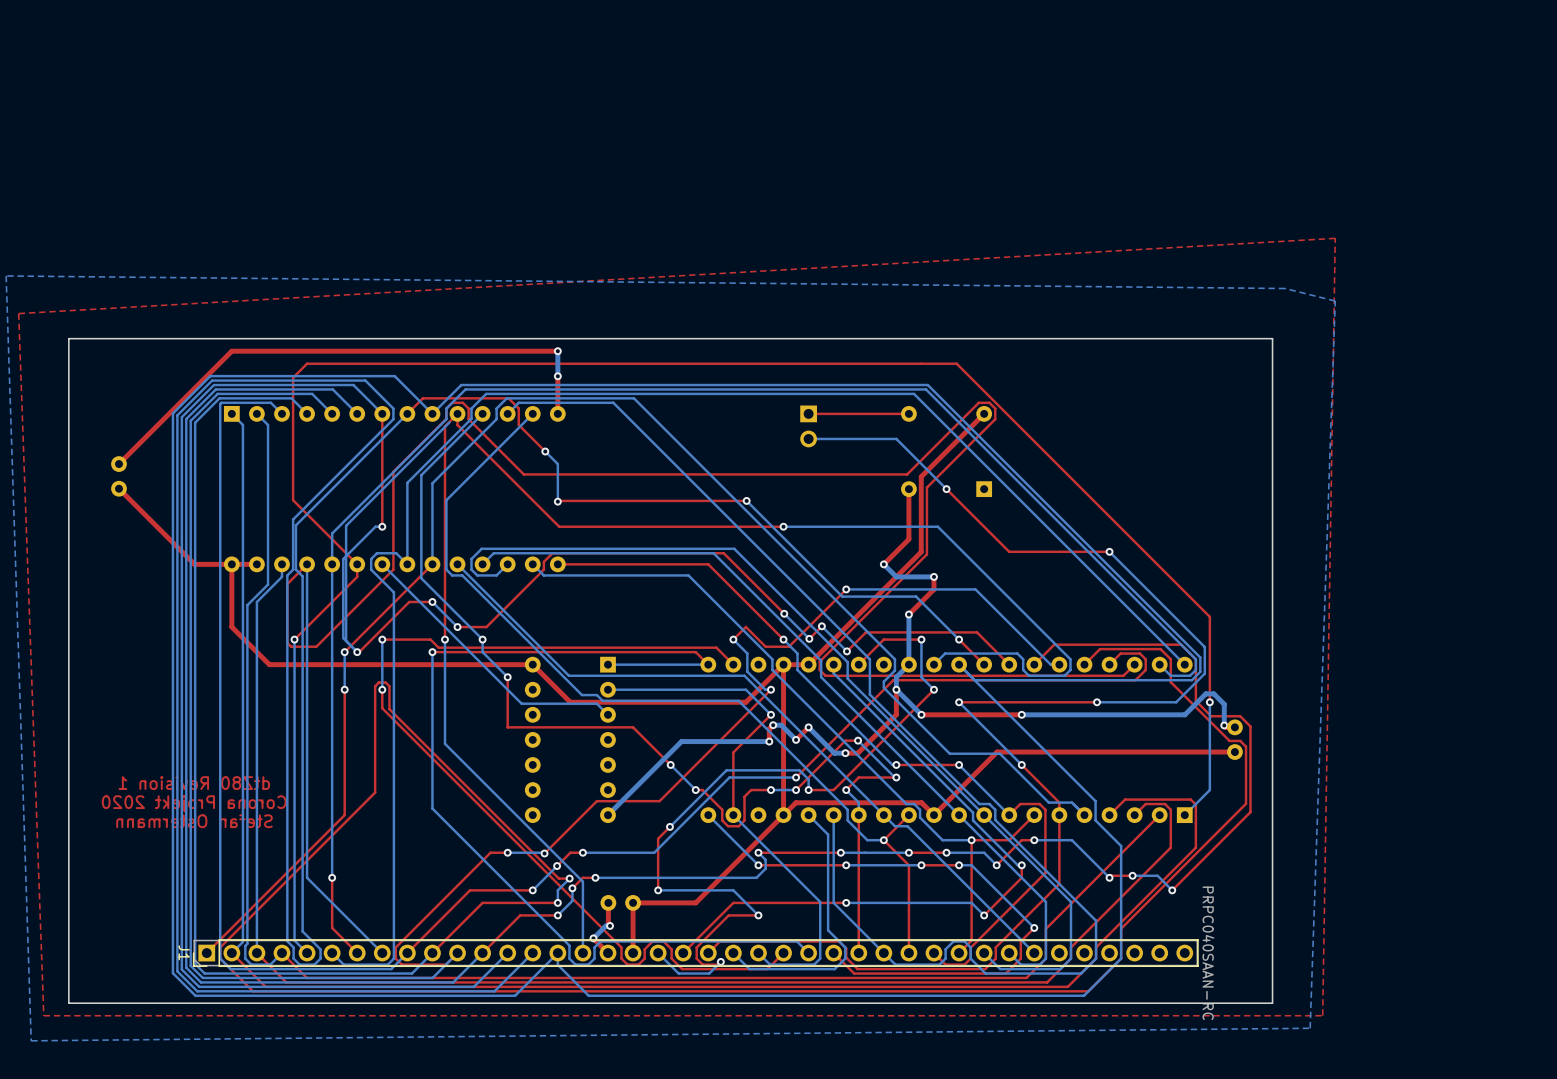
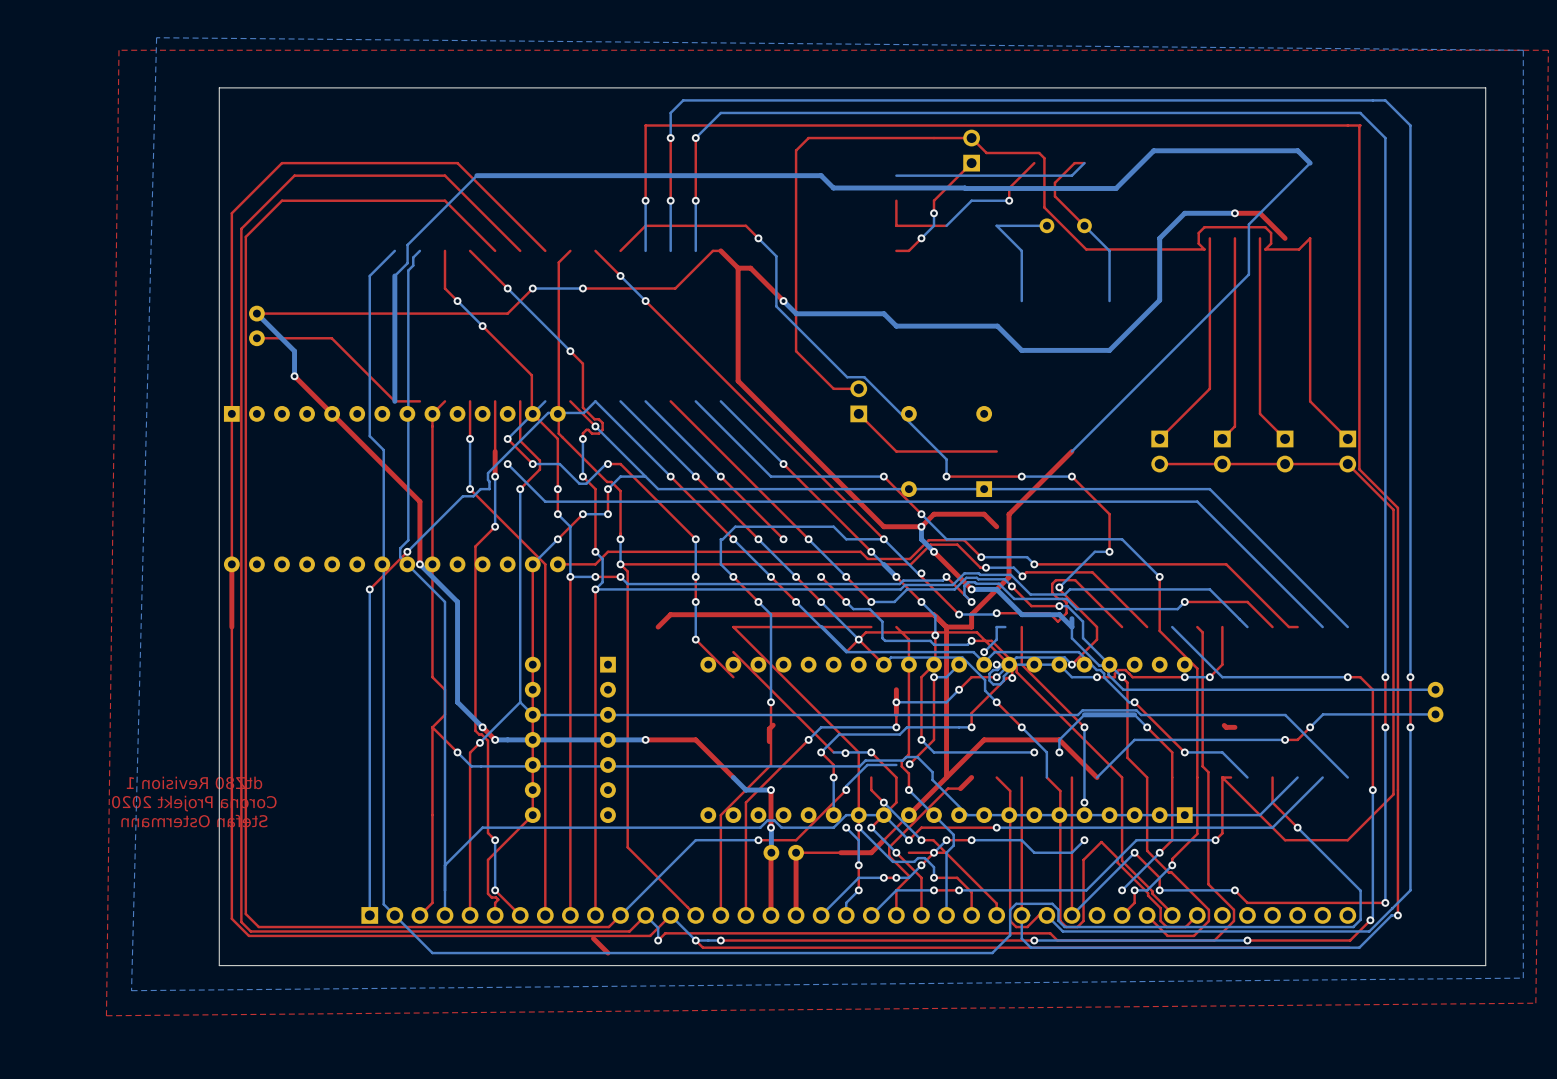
bottom track: none -> (670, 138) (670, 112) (683, 100) (1385, 100) (1410, 125) (1410, 677)
top track: none -> (670, 138) (670, 200)
via: none -> (670, 138)
bottom track: none -> (695, 138) (720, 112) (1360, 112) (1385, 138) (1385, 677)
top track: none -> (695, 138) (695, 200)
via: none -> (695, 138)
part: none -> (971, 150)
top track: none -> (971, 163) (934, 200) (934, 213)
top track: none -> (1034, 163) (1009, 188) (1009, 200)
bottom track: none -> (1084, 163) (1071, 175) (896, 175)
top track: none -> (1084, 163) (1074, 163) (1054, 182) (1054, 196) (1084, 225)
bottom track: none -> (645, 200) (645, 250)
top track: none -> (645, 200) (645, 125) (1360, 125) (1359, 469) (1397, 507) (1397, 915)
via: none -> (645, 200)
bottom track: none -> (670, 200) (670, 250)
via: none -> (670, 200)
bottom track: none -> (695, 200) (695, 250)
via: none -> (695, 200)
top track: none -> (896, 200) (896, 225) (946, 225)
bottom track: none -> (1009, 200) (971, 200) (946, 225)
via: none -> (1009, 200)
bottom track: none -> (934, 213) (934, 225) (921, 238)
via: none -> (934, 213)
bottom track: none -> (1234, 213) (1184, 213) (1159, 238) (1159, 300) (1109, 350) (1021, 350) (997, 326) (896, 326) (884, 313) (796, 313) (783, 301)
top track: none -> (1234, 213) (1260, 213) (1285, 238)
via: none -> (1234, 213)
bottom track: none -> (1046, 225) (996, 225) (1021, 250) (1021, 301)
part: none -> (1065, 225)
bottom track: none -> (1084, 225) (1109, 250) (1109, 301)
bottom track: none -> (758, 238) (776, 256) (776, 306) (847, 377) (864, 377) (946, 459) (946, 476)
top track: none -> (758, 238) (745, 225) (645, 225) (620, 250)
via: none -> (758, 238)
top track: none -> (921, 238) (908, 250) (896, 250)
via: none -> (921, 238)
top track: none -> (1209, 238) (1209, 388) (1159, 438)
top track: none -> (1234, 238) (1234, 426) (1222, 438)
top track: none -> (1260, 238) (1260, 413) (1285, 438)
top zone outline: (1335, 238) (1322, 1015) (43, 1015) (18, 313) (1335, 238) -> (1548, 50) (1535, 1003) (106, 1015) (118, 50) (1548, 50)
bottom track: none -> (394, 250) (369, 275) (369, 436) (383, 450) (383, 904) (432, 953) (992, 953) (1010, 935) (1010, 909) (1016, 903) (1052, 903) (1058, 909) (1058, 920) (1064, 927) (1353, 927) (1360, 919) (1360, 890) (1297, 827)
top track: none -> (445, 250) (445, 288) (457, 301)
top track: none -> (470, 250) (507, 288)
top track: none -> (495, 250) (445, 200) (282, 200) (245, 236) (245, 914) (258, 927) (608, 927) (620, 915)
top track: none -> (520, 250) (445, 175) (294, 175) (241, 228) (241, 922) (250, 931) (629, 931) (645, 915)
top track: none -> (545, 250) (457, 163) (282, 163) (231, 213) (231, 564)
top track: none -> (570, 250) (558, 262) (558, 433) (607, 481) (611, 481) (620, 491) (620, 539)
top track: none -> (595, 250) (620, 275)
top track: none -> (738, 268) (720, 250) (712, 250) (675, 288) (582, 288)
top track: none -> (738, 268) (738, 381) (883, 526) (921, 526) (934, 514) (984, 514) (996, 526)
top track: none -> (738, 268) (750, 268) (783, 301)
bottom zone outline: (6, 275) (1285, 288) (1335, 301) (1310, 1028) (31, 1040) (6, 275) -> (156, 37) (1523, 50) (1523, 978) (131, 990) (156, 37)
bottom track: none -> (620, 275) (645, 301)
via: none -> (620, 275)
bottom track: none -> (507, 288) (570, 351)
via: none -> (507, 288)
top track: none -> (532, 288) (507, 313) (256, 313)
via: none -> (532, 288)
bottom track: none -> (582, 288) (532, 288)
via: none -> (582, 288)
bottom track: none -> (457, 301) (482, 326)
via: none -> (457, 301)
top track: none -> (645, 301) (883, 539)
via: none -> (645, 301)
via: none -> (783, 301)
bottom track: none -> (256, 313) (294, 351) (294, 376)
top track: none -> (482, 326) (531, 375) (531, 412) (557, 438) (557, 514)
via: none -> (482, 326)
top track: none -> (256, 338) (331, 338) (394, 401) (419, 401)
board edge: (1272, 338) (1272, 1003) (68, 1003) (68, 338) (1272, 338) -> (1485, 87) (1485, 965) (219, 965) (219, 87) (1485, 87)
bottom track: (557, 351) (557, 376) -> (620, 539) (620, 564)
top track: (557, 351) (231, 351) (118, 464) -> none
via position: (557, 351) -> (570, 351)
top track: none -> (570, 351) (582, 363) (582, 407) (594, 419) (598, 419) (602, 422) (602, 429) (598, 433) (592, 433) (586, 429) (582, 433) (582, 438)
top track: none -> (294, 376) (419, 501) (419, 564)
via: none -> (294, 376)
top track: (557, 376) (557, 413) -> (470, 401) (470, 438)
via: (557, 376) -> none
top track: none -> (858, 388) (833, 388) (796, 351) (796, 150) (808, 138) (971, 138) (986, 153) (1039, 153) (1044, 158) (1044, 207) (1086, 249) (1204, 249) (1198, 243) (1198, 233) (1204, 227) (1265, 227) (1271, 233) (1271, 243) (1265, 249) (1299, 249) (1310, 238) (1310, 401) (1347, 438)
bottom track: none -> (394, 401) (394, 275) (407, 263) (407, 244) (476, 175) (821, 175) (833, 188) (1116, 188) (1153, 150) (1297, 150) (1310, 163) (1248, 224) (1248, 274) (1071, 451)
top track: none -> (445, 401) (432, 413) (432, 677) (445, 689) (445, 714) (432, 727)
top track: none -> (495, 401) (495, 476)
top track: none -> (520, 401) (520, 440) (539, 460) (539, 469) (520, 489)
bottom track: none -> (545, 401) (532, 413)
top track: none -> (570, 401) (595, 426)
bottom track: none -> (620, 401) (695, 476)
bottom track: none -> (645, 401) (720, 476)
top track: none -> (670, 401) (808, 539)
bottom track: none -> (695, 401) (771, 476) (883, 476)
bottom track: none -> (720, 401) (783, 464)
bottom track: (231, 413) (242, 425) (242, 941) (231, 953) -> none
bottom track: (256, 413) (268, 425) (268, 584) (247, 605) (247, 943) (245, 945) (245, 958) (251, 964) (270, 964) (282, 953) -> none
bottom track: (282, 413) (270, 402) (220, 403) (220, 958) (230, 969) (391, 969) (407, 953) -> none
bottom track: (307, 413) (291, 398) (219, 398) (195, 422) (195, 964) (204, 973) (411, 973) (432, 953) -> none
bottom track: (332, 413) (312, 393) (217, 393) (190, 420) (190, 965) (202, 977) (432, 977) (457, 953) -> none
bottom track: (357, 413) (332, 389) (215, 389) (186, 419) (186, 967) (201, 982) (453, 982) (482, 953) -> none
bottom track: (382, 413) (353, 385) (214, 385) (181, 417) (181, 969) (199, 986) (473, 986) (507, 953) -> none
top track: (382, 413) (382, 526) -> none
bottom track: (407, 413) (295, 525) (295, 569) (302, 576) (302, 931) (320, 949) (320, 958) (314, 964) (299, 964) (293, 958) (293, 947) (287, 941) (287, 575) (293, 569) (293, 519) (393, 419) (393, 408) (365, 380) (212, 380) (177, 415) (177, 971) (197, 991) (494, 991) (532, 953) -> none
top track: (407, 413) (422, 398) (508, 398) (518, 408) (518, 425) (545, 451) -> none
bottom track: (482, 413) (421, 475) (421, 578) -> (407, 564) (421, 578)
bottom track: (507, 413) (518, 402) (613, 402) (869, 659) (869, 694) (979, 804) (989, 804) (995, 809) (995, 819) (1096, 920) (1096, 958) (1081, 973) (985, 973) (970, 958) (970, 947) (964, 941) (953, 941) (945, 949) (945, 958) (939, 964) (895, 964) (833, 902) (833, 815) -> (833, 777) (833, 815)
top track: none -> (858, 413) (896, 451) (996, 451)
top track: (908, 413) (808, 413) -> none
top track: (984, 413) (921, 476) (921, 552) (808, 664) (783, 664) -> none
bottom track: (449, 422) (346, 525) (346, 641) -> none
bottom track: none -> (595, 426) (658, 489) (1209, 489) (1347, 627)
via: none -> (595, 426)
part rotation: 0° (808, 426) -> 180° (858, 401)
part position: (808, 426) -> (858, 401)
bottom track: none -> (470, 438) (470, 489)
via: none -> (470, 438)
bottom track: (507, 438) (446, 500) (446, 569) (452, 575) (462, 575) (581, 695) (596, 695) (602, 700) (738, 700) (847, 809) (847, 820) (867, 840) (883, 840) -> none
top track: none -> (507, 438) (532, 464)
via: none -> (507, 438)
bottom track: none -> (582, 438) (582, 476)
via: none -> (582, 438)
bottom track: (808, 438) (896, 438) (946, 489) -> none
bottom track: (545, 451) (557, 464) (557, 501) -> none
via position: (545, 451) -> (532, 464)
top track: none -> (1071, 451) (1009, 514) (1009, 577) (971, 614) (971, 627) (946, 627) (933, 614) (670, 614) (658, 627)
part: none -> (1159, 451)
part: none -> (1222, 451)
part: none -> (1285, 451)
part: none -> (1347, 451)
bottom track: none -> (507, 464) (545, 501) (1197, 501) (1322, 627)
via: none -> (507, 464)
bottom track: none -> (608, 464) (586, 483) (579, 483) (559, 464) (532, 464)
top track: none -> (608, 464) (620, 464) (695, 539)
via: none -> (608, 464)
top track: none -> (783, 464) (871, 551)
via: none -> (783, 464)
top track: none -> (1159, 464) (1347, 464) (1393, 509) (1393, 794) (1347, 840) (1285, 840) (1222, 777)
part position: (118, 476) -> (256, 325)
via: none -> (495, 476)
top track: none -> (582, 476) (595, 489) (595, 551)
via: none -> (582, 476)
bottom track: none -> (645, 476) (620, 476) (608, 489)
bottom track: none -> (670, 476) (595, 401) (583, 412) (548, 412) (487, 473) (489, 489) (480, 489) (473, 496) (462, 496) (407, 551)
top track: none -> (670, 476) (733, 539)
via: none -> (670, 476)
top track: none -> (695, 476) (758, 539)
via: none -> (695, 476)
top track: none -> (720, 476) (783, 539)
via: none -> (720, 476)
top track: none -> (883, 476) (921, 514)
via: none -> (883, 476)
top track: none -> (1021, 476) (946, 476)
via: none -> (1021, 476)
bottom track: none -> (1071, 476) (1021, 476)
via: none -> (1071, 476)
top track: (118, 488) (194, 564) (256, 564) -> none
top track: none -> (470, 489) (545, 564) (545, 915)
via: none -> (470, 489)
bottom track: none -> (520, 489) (520, 702) (479, 742)
via: none -> (520, 489)
via: none -> (557, 489)
top track: none -> (608, 489) (608, 514)
via: none -> (608, 489)
top track: (908, 489) (908, 539) (883, 564) -> none
top track: (946, 489) (1009, 551) (1109, 551) -> (1071, 476) (1109, 514) (1109, 551)
via position: (946, 489) -> (946, 476)
bottom track: (746, 500) (842, 596) (916, 596) (921, 601) -> none
top track: (746, 500) (557, 501) -> none
via: (746, 500) -> none
via: (557, 501) -> none
bottom track: none -> (557, 514) (570, 526) (570, 576) (595, 576)
via: none -> (557, 514)
top track: none -> (582, 514) (557, 539)
via: none -> (582, 514)
bottom track: none -> (608, 514) (582, 514)
via: none -> (608, 514)
bottom track: none -> (921, 514) (946, 539) (1122, 539) (1159, 576)
via: none -> (921, 514)
bottom track: (382, 526) (375, 526) (343, 559) (343, 638) (357, 652) -> none
via: (382, 526) -> none
top track: none -> (495, 526) (475, 546) (475, 730) (487, 740) (487, 833) (495, 840)
via: none -> (495, 526)
bottom track: none -> (783, 526) (735, 526) (720, 539) (720, 564) (733, 576)
top track: (783, 526) (559, 526) (457, 425) (457, 413) (445, 426) (445, 639) -> none
via position: (783, 526) -> (783, 539)
bottom track: (833, 526) (937, 526) (1070, 659) (1070, 669) (1064, 675) (1028, 675) (1023, 669) (1023, 659) (1017, 653) (945, 653) (934, 664) -> (833, 526) (846, 539) (883, 539) (917, 573) (921, 573)
bottom track: none -> (921, 526) (921, 539) (934, 551)
via: none -> (921, 526)
via: none -> (557, 539)
via: none -> (620, 539)
bottom track: none -> (695, 539) (695, 576)
via: none -> (695, 539)
bottom track: none -> (733, 539) (771, 576)
via: none -> (733, 539)
bottom track: none -> (758, 539) (796, 576)
via: none -> (758, 539)
bottom track: none -> (808, 539) (846, 576)
via: none -> (808, 539)
via: none -> (883, 539)
top track: none -> (407, 551) (369, 589)
via: none -> (407, 551)
bottom track: none -> (595, 551) (602, 558) (602, 582) (595, 589) (846, 589)
via: none -> (595, 551)
bottom track: none -> (871, 551) (883, 564)
via: none -> (871, 551)
top track: none -> (934, 551) (971, 589)
via: none -> (934, 551)
bottom track: (1109, 551) (1204, 647) (1204, 673) (1176, 702) (1134, 702) -> (1109, 551) (1094, 551) (1059, 587)
bottom track: (400, 557) (396, 553) (376, 553) (371, 559) (371, 569) (393, 592) (393, 958) (387, 964) (343, 964) (332, 953) -> (400, 557) (400, 548) (408, 540) (408, 270) (413, 265) (413, 257) (419, 250)
bottom track: none -> (981, 557) (1027, 557) (1034, 564)
via: none -> (981, 557)
bottom track: (282, 564) (282, 576) (256, 601) (256, 953) -> none
bottom track: (307, 564) (307, 877) (382, 953) -> none
top track: (307, 564) (287, 584) (287, 643) (291, 646) (316, 646) (393, 569) (393, 471) (446, 418) (446, 408) (452, 402) (462, 402) (468, 408) (468, 419) (523, 474) (907, 474) (978, 402) (989, 402) (995, 408) (995, 419) (926, 487) (926, 554) (819, 661) (819, 669) (825, 675) (1123, 675) (1134, 664) -> none
bottom track: (382, 564) (520, 702) -> none
bottom track: (407, 564) (407, 482) (471, 418) (471, 408) (486, 393) (914, 393) (1184, 664) -> none
bottom track: none -> (419, 564) (457, 601) (457, 702) (482, 727)
via: none -> (419, 564)
bottom track: (432, 564) (432, 483) (496, 419) (496, 408) (506, 398) (633, 398) (894, 659) (894, 670) (883, 681) (883, 687) (949, 753) (999, 753) (1048, 802) (1071, 802) (1084, 815) -> none
top track: (432, 564) (344, 652) -> none
bottom track: (457, 564) (568, 675) (744, 675) (883, 815) -> (445, 865) (482, 827) (760, 827) (767, 820) (774, 820) (781, 827) (833, 827) (846, 815) (883, 815)
bottom track: (482, 564) (493, 553) (713, 553) (821, 660) (821, 677) (1045, 901) (1045, 958) (1039, 964) (1020, 964) (1009, 953) -> none
bottom track: (507, 564) (496, 575) (477, 575) (471, 569) (471, 559) (481, 548) (734, 548) (847, 662) (847, 678) (1070, 901) (1070, 958) (1060, 969) (1000, 969) (984, 953) -> none
bottom track: (532, 564) (543, 575) (688, 575) (772, 659) (772, 669) (906, 804) (914, 804) (920, 809) (920, 817) (942, 840) (971, 840) -> (532, 564) (557, 539)
top track: none -> (532, 564) (532, 815) (487, 859) (487, 893) (498, 899) (495, 902) (495, 915)
top track: (620, 564) (595, 564) -> (981, 557) (964, 540) (928, 540) (909, 558) (867, 558) (860, 551) (608, 551) (595, 564)
top track: none -> (620, 564) (627, 571) (627, 847) (695, 915)
via: none -> (620, 564)
top track: (708, 564) (783, 639) -> (708, 564) (910, 564) (930, 544) (957, 544) (980, 567) (986, 567)
via: (883, 564) -> none
top track: none -> (1034, 564) (1226, 564) (1288, 627) (1297, 627)
via: none -> (1034, 564)
bottom track: none -> (986, 567) (1013, 567) (1022, 576)
via: none -> (986, 567)
top track: none -> (921, 573) (921, 576) (959, 614)
via: none -> (921, 573)
top track: none -> (570, 576) (570, 915)
via: none -> (570, 576)
via: none -> (595, 576)
top track: none -> (620, 576) (595, 576)
via: none -> (620, 576)
top track: none -> (695, 576) (695, 601)
via: none -> (695, 576)
top track: none -> (733, 576) (758, 601)
via: none -> (733, 576)
top track: none -> (771, 576) (796, 601)
via: none -> (771, 576)
top track: none -> (796, 576) (821, 601)
via: none -> (796, 576)
top track: none -> (821, 576) (846, 601)
via: none -> (821, 576)
top track: none -> (846, 576) (871, 601)
via: none -> (846, 576)
top track: none -> (896, 576) (921, 601)
via: none -> (896, 576)
bottom track: (934, 576) (896, 576) -> (871, 752) (833, 752)
top track: (934, 576) (934, 589) (908, 614) -> none
via: (934, 576) -> none
bottom track: none -> (946, 576) (942, 580) (903, 580) (899, 584) (627, 584) (620, 576)
via: none -> (946, 576)
top track: none -> (1022, 576) (1026, 572) (1092, 572) (1147, 627)
via: none -> (1022, 576)
top track: none -> (1159, 576) (1159, 630) (1197, 668) (1197, 833) (1172, 859) (1172, 865)
via: none -> (1159, 576)
top track: none -> (1011, 586) (1031, 606) (1059, 606)
via: none -> (1011, 586)
top track: none -> (1059, 587) (1097, 627) (1097, 639) (1071, 664)
via: none -> (1059, 587)
bottom track: none -> (369, 589) (369, 915)
via: none -> (369, 589)
top track: none -> (595, 589) (595, 915)
via: none -> (595, 589)
top track: (846, 589) (788, 646) (765, 646) (745, 627) (733, 639) -> none
via: (846, 589) -> none
bottom track: none -> (900, 589) (905, 584) (952, 584) (964, 573) (1010, 574) (1030, 594) (1064, 594) (1069, 589) (1209, 589) (1247, 627)
bottom track: (907, 589) (900, 589) -> (907, 589) (894, 601) (871, 601)
bottom track: (971, 589) (954, 589) -> (1011, 586) (1004, 579) (966, 577) (954, 589)
via: none -> (971, 589)
bottom track: (975, 589) (1050, 664) -> (975, 589) (996, 589) (1021, 614) (1059, 614) (1071, 627)
bottom track: (432, 601) (457, 627) -> none
top track: (432, 601) (409, 601) (357, 652) -> none
via: (432, 601) -> none
bottom track: (445, 601) (482, 639) (482, 652) (507, 677) -> (445, 601) (445, 639)
bottom track: none -> (695, 601) (695, 639)
via: none -> (695, 601)
bottom track: none -> (758, 601) (771, 614) (771, 702)
via: none -> (758, 601)
via: none -> (796, 601)
bottom track: none -> (821, 601) (858, 639)
via: none -> (821, 601)
bottom track: none -> (846, 601) (853, 609) (869, 609) (882, 621) (882, 638) (885, 640) (930, 640) (934, 644) (967, 644) (971, 640)
via: none -> (846, 601)
via: none -> (871, 601)
via: none -> (921, 601)
via: none -> (971, 601)
bottom track: none -> (1184, 601) (1177, 609) (1076, 609) (1066, 598) (1014, 598) (999, 583) (968, 582) (964, 586) (964, 594) (971, 601)
top track: none -> (1184, 601) (1247, 601) (1272, 627)
via: none -> (1184, 601)
bottom track: none -> (1059, 606) (1067, 606) (1083, 621) (1083, 638) (1122, 677)
via: none -> (1059, 606)
bottom track: (784, 613) (809, 638) -> none
top track: (784, 613) (723, 553) (552, 553) (543, 561) (543, 569) (486, 627) (457, 627) -> none
via: (784, 613) -> none
bottom track: none -> (996, 613) (959, 614)
top track: none -> (996, 613) (1049, 613) (1057, 621) (1066, 613) (1066, 602) (1062, 598) (1058, 598) (1052, 592) (1052, 583) (1055, 580) (1075, 580) (1122, 627)
via: none -> (996, 613)
bottom track: (908, 614) (908, 664) (896, 677) (896, 689) (921, 714) -> none
via: (908, 614) -> none
via: none -> (959, 614)
bottom track: (935, 615) (959, 639) -> (935, 615) (935, 635)
top track: none -> (935, 615) (946, 627) (946, 777)
bottom track: none -> (1071, 618) (1071, 627)
top track: (821, 626) (809, 638) -> none
via: (821, 626) -> none
top track: (231, 627) (269, 664) (532, 664) (570, 702) (745, 702) (783, 664) -> (231, 627) (231, 918) (248, 935) (650, 935) (670, 915)
via: (457, 627) -> none
top track: none -> (871, 627) (733, 627) (858, 752) (858, 815)
top track: none -> (896, 627) (908, 639) (908, 754) (901, 761) (901, 766) (908, 773) (908, 790)
bottom track: none -> (1005, 627) (996, 627) (996, 639) (984, 652)
top track: none -> (1021, 627) (1021, 664) (1084, 727)
bottom track: none -> (1071, 627) (1071, 638) (1099, 665) (1102, 665) (1108, 671) (1108, 674) (1123, 689) (1435, 689)
bottom track: none -> (1172, 627) (1222, 677) (1347, 677)
top track: none -> (1197, 627) (1202, 632) (1202, 766) (1208, 772) (1208, 884) (1233, 909) (1233, 921) (1214, 940) (1057, 940) (1050, 933) (665, 933) (658, 940)
top track: none -> (1222, 627) (1222, 664) (1209, 677)
top track: none -> (935, 635) (935, 663) (921, 677) (921, 739)
via: none -> (935, 635)
via: (809, 638) -> none
bottom track: (294, 639) (294, 940) (307, 953) -> none
top track: (294, 639) (357, 576) (357, 564) (293, 500) (293, 377) (307, 363) (956, 363) (1209, 616) (1209, 702) -> none
via: (294, 639) -> none
bottom track: (382, 639) (382, 689) -> (495, 476) (495, 526)
top track: (382, 639) (430, 639) (438, 647) (716, 647) (733, 664) -> none
via: (382, 639) -> none
via: (445, 639) -> none
via: (482, 639) -> none
top track: none -> (695, 639) (733, 677)
via: none -> (695, 639)
bottom track: (733, 639) (747, 653) (747, 671) (765, 689) (771, 689) -> none
via: (733, 639) -> none
bottom track: (783, 639) (797, 653) (797, 669) (892, 764) -> none
via: (783, 639) -> none
top track: none -> (858, 639) (883, 664)
bottom track: (921, 639) (921, 677) (934, 689) -> none
top track: (921, 639) (883, 639) (858, 664) -> none
via: (921, 639) -> none
top track: (959, 639) (984, 664) -> (946, 576) (971, 601)
via: (959, 639) -> none
top track: none -> (971, 640) (991, 640) (1016, 665) (1016, 672) (1122, 777) (1122, 860) (1152, 891) (1152, 893) (1172, 915)
via: none -> (971, 640)
via position: (846, 651) -> (858, 639)
bottom track: (344, 652) (344, 689) -> none
via: (344, 652) -> none
via: (357, 652) -> none
bottom track: (432, 652) (432, 808) (569, 945) (569, 958) (575, 964) (588, 964) (594, 958) (594, 947) (600, 941) (797, 941) (808, 953) -> none
top track: (432, 652) (695, 652) (708, 664) -> none
via: (432, 652) -> none
top track: none -> (733, 652) (833, 752)
via: none -> (984, 652)
bottom track: (708, 664) (608, 664) -> none
top track: (783, 664) (783, 815) -> none
bottom track: (833, 664) (833, 673) (917, 757) -> (457, 752) (471, 766) (859, 766) (865, 760) (902, 760) (906, 757) (917, 757)
bottom track: none -> (883, 664) (891, 657) (962, 657) (985, 680) (985, 690)
bottom track: (959, 664) (985, 690) -> (959, 664) (946, 677) (934, 677)
via: none -> (996, 664)
top track: none -> (1009, 664) (1012, 667) (1012, 678) (1006, 678) (971, 713) (971, 727)
top track: (1034, 664) (1054, 644) (1181, 644) (1195, 659) (1195, 700) (1211, 716) (1240, 716) (1250, 726) (1250, 812) (1172, 890) -> none
bottom track: none -> (1050, 664) (1015, 664) (1003, 676) (1003, 680) (1000, 684) (993, 684) (989, 680) (989, 673) (1002, 664) (996, 664)
bottom track: none -> (1059, 664) (1071, 677) (1097, 677)
bottom track: none -> (1071, 664) (1064, 657) (1016, 657) (996, 677)
via: none -> (1071, 664)
top track: (1084, 664) (1100, 649) (1160, 649) (1170, 659) (1170, 682) (1229, 740) (1240, 740) (1246, 746) (1246, 803) (1121, 928) (1121, 958) (1088, 991) (252, 991) (220, 958) (220, 947) (375, 792) (375, 686) (378, 682) (385, 682) (389, 686) (389, 709) (558, 878) (569, 878) -> none
top track: (1109, 664) (1120, 653) (1139, 653) (1145, 659) (1145, 669) (1135, 680) (893, 680) (796, 777) -> none
bottom track: (1159, 664) (1170, 675) (1190, 675) (1195, 669) (1195, 659) (926, 389) (465, 389) (446, 408) (446, 419) (332, 533) (332, 877) -> none
top track: (507, 677) (507, 727) (633, 727) (670, 764) -> none
via: (507, 677) -> none
top track: none -> (934, 677) (934, 739) (909, 764)
via: none -> (934, 677)
top track: none -> (996, 677) (971, 677) (959, 689)
via: none -> (996, 677)
via: none -> (1097, 677)
top track: none -> (1122, 677) (1127, 682) (1127, 757) (1147, 777) (1147, 850) (1208, 909) (1208, 921) (1193, 935) (1167, 935) (1147, 915)
via: none -> (1122, 677)
top track: none -> (1184, 677) (1132, 677) (1125, 670) (1118, 670) (1114, 673) (1114, 677) (1097, 677)
via: none -> (1184, 677)
bottom track: none -> (1209, 677) (1184, 677)
via: none -> (1209, 677)
top track: none -> (1347, 677) (1360, 677) (1372, 689) (1372, 790)
via: none -> (1347, 677)
top track: none -> (1385, 677) (1385, 727)
via: none -> (1385, 677)
top track: none -> (1410, 677) (1410, 727)
via: none -> (1410, 677)
via: none -> (1012, 678)
bottom track: (974, 680) (1191, 680) (1200, 671) (1200, 657) (927, 385) (461, 385) (432, 413) (394, 376) (210, 376) (172, 413) (172, 973) (195, 995) (515, 995) (557, 953) (557, 964) (588, 995) (1084, 995) (1121, 958) (1121, 846) (1095, 820) (1095, 801) (1046, 752) -> (1046, 777) (1046, 752)
top track: (344, 689) (344, 815) (206, 953) -> none
via: (344, 689) -> none
top track: (382, 689) (382, 708) (621, 947) (621, 958) (627, 964) (638, 964) (644, 958) (644, 949) (652, 941) (663, 941) (671, 949) (671, 958) (682, 969) (767, 969) (783, 953) -> none
via: (382, 689) -> none
bottom track: (608, 689) (745, 689) (771, 714) -> none
top track: (771, 689) (659, 801) (596, 801) (544, 853) -> none
via: (771, 689) -> none
via position: (896, 689) -> (896, 702)
top track: (934, 689) (833, 790) (808, 790) -> none
via: (934, 689) -> none
bottom track: none -> (959, 689) (946, 702) (896, 702)
via: none -> (959, 689)
top track: none -> (771, 702) (771, 764) (720, 815) (720, 915)
via: none -> (771, 702)
bottom track: (959, 702) (1021, 764) -> none
via: (959, 702) -> none
bottom track: (996, 702) (1021, 727) -> (871, 827) (896, 852)
top track: none -> (996, 702) (1021, 727)
via: none -> (996, 702)
top track: (1097, 702) (959, 702) -> none
via: (1097, 702) -> none
bottom track: (1129, 702) (1097, 702) -> (1129, 702) (1104, 677) (1104, 673) (1100, 670) (1096, 670) (1078, 652) (994, 652) (987, 659) (980, 659) (973, 652) (846, 652) (796, 601)
top track: none -> (1134, 702) (1184, 752)
via: none -> (1134, 702)
bottom track: (1209, 702) (1209, 790) (1184, 815) -> none
via: (1209, 702) -> none
bottom track: (521, 703) (596, 703) (608, 714) -> (521, 703) (532, 715) (1077, 715) (1082, 710) (1136, 710) (1141, 715) (1285, 715) (1347, 777)
top track: (771, 714) (733, 752) (733, 815) -> none
via: (771, 714) -> none
top track: (896, 714) (857, 753) (845, 753) -> (896, 714) (896, 727)
via: (921, 714) -> none
top track: (1021, 714) (921, 714) -> none
via position: (1021, 714) -> (1021, 727)
bottom track: (1084, 714) (1021, 714) -> (1084, 714) (1059, 739) (1059, 752)
bottom track: (1134, 714) (1184, 714) (1205, 693) (1213, 693) (1224, 704) (1224, 725) -> (1134, 714) (1147, 727)
bottom track: none -> (1435, 714) (1323, 714) (1310, 727)
bottom track: (773, 725) (781, 725) (796, 739) -> none
via: (773, 725) -> none
via: (1224, 725) -> none
top track: none -> (432, 727) (432, 902) (419, 915)
top track: none -> (432, 727) (457, 752)
top track: none -> (482, 727) (495, 739)
via: none -> (482, 727)
bottom track: (808, 727) (834, 753) (845, 753) -> none
top track: (808, 727) (796, 739) -> none
via: (808, 727) -> none
bottom track: none -> (896, 727) (821, 727) (808, 739)
via: none -> (896, 727)
bottom track: none -> (971, 727) (906, 727) (899, 734) (839, 734) (821, 752)
via: none -> (971, 727)
bottom track: none -> (1084, 727) (1084, 802)
via: none -> (1084, 727)
top track: none -> (1147, 727) (1172, 752) (1172, 840) (1159, 852)
via: none -> (1147, 727)
top track: none -> (1310, 727) (1297, 739) (1285, 739)
via: none -> (1310, 727)
bottom track: none -> (1385, 727) (1385, 902)
via: none -> (1385, 727)
bottom track: none -> (1410, 727) (1410, 890) (1369, 931) (1062, 931) (1046, 915)
via: none -> (1410, 727)
via: none -> (495, 739)
bottom track: none -> (645, 739) (495, 739)
top track: none -> (645, 739) (695, 739) (733, 777)
via: none -> (645, 739)
via: (796, 739) -> none
top track: none -> (808, 739) (745, 802) (745, 915)
via: none -> (808, 739)
bottom track: none -> (921, 739) (934, 752) (1034, 752)
via: none -> (921, 739)
part position: (1234, 739) -> (1435, 702)
bottom track: none -> (1285, 739) (1134, 739) (1097, 777)
via: none -> (1285, 739)
bottom track: (858, 740) (896, 777) -> none
top track: (858, 740) (845, 740) (796, 790) -> none
via: (858, 740) -> none
bottom track: (769, 741) (681, 741) (608, 815) -> none
via: (769, 741) -> none
top track: none -> (479, 742) (470, 752) (470, 915)
via: none -> (479, 742)
bottom track: (445, 743) (582, 881) (582, 953) -> (445, 743) (445, 915)
via: none -> (457, 752)
top track: none -> (821, 752) (833, 764) (833, 777)
via: none -> (821, 752)
top track: none -> (871, 752) (896, 777) (896, 802) (871, 827)
via: none -> (871, 752)
via: none -> (1059, 752)
bottom track: none -> (1184, 752) (1222, 752) (1247, 777)
via: none -> (1184, 752)
top track: (1234, 752) (997, 752) (971, 777) -> none
bottom track: (670, 764) (695, 790) -> none
via: (670, 764) -> none
via: (896, 764) -> none
via: none -> (909, 764)
bottom track: (959, 764) (1009, 815) -> none
top track: (959, 764) (896, 764) -> none
via: (959, 764) -> none
top track: (1021, 764) (1059, 802) (1059, 883) (995, 947) (995, 958) (985, 969) (857, 969) (846, 957) (846, 948) (839, 941) (719, 941) (708, 953) -> none
via position: (1021, 764) -> (1034, 752)
bottom track: (932, 772) (973, 812) (973, 820) (1017, 865) (1021, 865) -> (932, 772) (932, 779) (967, 815) (1260, 815) (1297, 777)
bottom track: (796, 777) (729, 777) (654, 852) (582, 852) -> none
via: (796, 777) -> none
via: none -> (833, 777)
top track: none -> (871, 777) (871, 790) (883, 802)
top track: (896, 777) (858, 777) (846, 790) -> (758, 840) (796, 840) (846, 790)
via: (896, 777) -> none
top track: none -> (996, 777) (1010, 790) (1010, 921) (1016, 927) (1027, 927) (1038, 915) (1046, 915)
top track: none -> (1021, 777) (1021, 865)
top track: none -> (1046, 777) (1060, 790) (1060, 921) (1066, 927) (1077, 927) (1083, 921) (1083, 859) (1101, 842) (1117, 858) (1117, 862) (1160, 908) (1160, 921) (1166, 927) (1185, 927) (1197, 915)
top track: none -> (1071, 777) (1071, 915)
top track: none -> (1097, 777) (1059, 739) (984, 739) (908, 815)
top track: none -> (1222, 777) (1222, 833) (1215, 840)
top track: none -> (1231, 777) (1222, 777)
top track: none -> (1272, 777) (1272, 802) (1297, 827)
bottom track: none -> (1322, 777) (1272, 827) (996, 827)
top track: (960, 788) (934, 815) (921, 802) (795, 802) (695, 902) (633, 902) (633, 953) -> (960, 788) (947, 788) (889, 847) (889, 856) (908, 875)
via: (695, 790) -> none
top track: (771, 790) (751, 790) (744, 796) (744, 820) (738, 826) (728, 826) (722, 820) (722, 809) (702, 790) (695, 790) -> (771, 790) (771, 827)
bottom track: (796, 790) (771, 790) -> (733, 777) (745, 790) (771, 790)
via: (796, 790) -> none
bottom track: (808, 790) (808, 779) (799, 770) (726, 770) (669, 826) -> none
via: (808, 790) -> none
bottom track: (846, 790) (858, 802) (858, 815) -> (846, 790) (846, 786) (867, 764) (892, 764)
bottom track: none -> (908, 790) (953, 834) (953, 845) (946, 852) (946, 915)
via: none -> (908, 790)
bottom track: none -> (1372, 790) (1372, 917) (1370, 920)
via: none -> (1372, 790)
bottom track: none -> (883, 802) (907, 826)
via: none -> (883, 802)
via: none -> (1084, 802)
bottom track: (708, 815) (758, 865) -> none
bottom track: (733, 815) (820, 901) (820, 958) (814, 964) (770, 964) (758, 953) -> none
bottom track: (808, 815) (828, 834) (828, 930) (845, 947) (845, 958) (834, 969) (749, 969) (733, 953) -> none
top track: (1009, 815) (1020, 804) (1039, 804) (1045, 809) (1045, 872) (970, 947) (970, 958) (964, 964) (945, 964) (934, 953) -> none
top track: (1034, 815) (1009, 840) (971, 840) (971, 892) -> (934, 877) (957, 877) (971, 892)
top track: (1109, 815) (1125, 799) (1190, 799) (1195, 804) (1195, 847) (1096, 947) (1096, 958) (1067, 986) (265, 986) (231, 953) -> none
top track: (1134, 815) (1145, 804) (1165, 804) (1170, 809) (1170, 847) (1070, 947) (1070, 958) (1047, 982) (286, 982) (256, 953) -> none
top track: (1159, 815) (1045, 928) (1045, 958) (1026, 977) (306, 977) (282, 953) -> none
top track: (669, 826) (658, 838) (658, 890) -> none
via: (669, 826) -> none
bottom track: (907, 826) (894, 826) -> (908, 840) (894, 826)
bottom track: none -> (771, 827) (771, 852)
via: none -> (771, 827)
bottom track: none -> (846, 827) (858, 840) (858, 865)
via: none -> (846, 827)
bottom track: none -> (858, 827) (892, 861) (914, 861) (918, 858) (924, 858) (934, 867) (934, 877)
via: none -> (858, 827)
via: none -> (871, 827)
top track: none -> (996, 827) (921, 827) (908, 840)
via: none -> (996, 827)
via: none -> (1297, 827)
bottom track: none -> (495, 840) (495, 890)
bottom track: none -> (758, 840) (695, 840) (620, 915)
via: none -> (758, 840)
top track: (883, 840) (896, 852) -> (883, 840) (871, 852) (840, 852)
via: (883, 840) -> none
via: none -> (908, 840)
bottom track: (921, 840) (1034, 953) -> none
top track: none -> (921, 840) (933, 840) (996, 903) (996, 915)
via: none -> (921, 840)
bottom track: none -> (946, 840) (934, 852)
via: none -> (946, 840)
top track: none -> (971, 840) (946, 840)
bottom track: (1034, 840) (1071, 840) (1109, 877) -> none
top track: (1034, 840) (1021, 840) (996, 865) -> none
via: (1034, 840) -> none
bottom track: none -> (1084, 840) (1071, 852) (1034, 852) (1021, 840) (971, 840)
via: none -> (1084, 840)
bottom track: none -> (1215, 840) (1136, 840) (1086, 890) (959, 890)
via: none -> (1215, 840)
bottom track: (507, 852) (544, 853) -> none
top track: (507, 852) (490, 852) (395, 947) (395, 958) (401, 964) (445, 964) (457, 953) -> none
via position: (507, 852) -> (495, 840)
top track: (582, 852) (570, 852) (557, 866) -> none
via: (582, 852) -> none
bottom track: (758, 852) (765, 859) (765, 868) (756, 877) (595, 877) -> none
via: (758, 852) -> none
top track: none -> (771, 852) (771, 915)
top track: (796, 852) (758, 852) -> (796, 852) (796, 915)
via: (840, 852) -> none
via: none -> (896, 852)
bottom track: (908, 852) (840, 852) -> none
via: (908, 852) -> none
via: none -> (934, 852)
bottom track: (946, 852) (984, 852) (996, 865) -> none
via: (946, 852) -> none
bottom track: none -> (1134, 852) (1071, 915)
top track: none -> (1134, 852) (1159, 877) (1159, 890)
via: none -> (1134, 852)
bottom track: none -> (1159, 852) (1122, 890)
via: none -> (1159, 852)
via: (544, 853) -> none
via: (758, 865) -> none
top track: (846, 865) (758, 865) -> none
via: (846, 865) -> none
via: none -> (858, 865)
top track: (908, 865) (908, 875) -> (908, 865) (921, 877) (921, 915)
bottom track: (921, 865) (846, 865) -> (921, 865) (908, 877) (896, 877)
bottom track: (959, 865) (971, 865) (1034, 927) -> none
top track: (959, 865) (921, 865) -> (934, 852) (921, 865)
via: (959, 865) -> none
via: (996, 865) -> none
via: (1021, 865) -> none
bottom track: none -> (1172, 865) (1147, 890) (1134, 890)
via: none -> (1172, 865)
bottom track: (557, 866) (532, 890) -> none
via: (557, 866) -> none
bottom track: (1132, 875) (1157, 875) (1172, 890) -> none
top track: (1132, 875) (1111, 875) (1109, 877) -> none
via: (1132, 875) -> none
top track: (332, 877) (332, 927) (357, 953) -> none
via: (332, 877) -> none
top track: (595, 877) (582, 877) (572, 888) -> none
via: (595, 877) -> none
bottom track: none -> (883, 877) (858, 877) (821, 915)
via: none -> (883, 877)
top track: none -> (896, 877) (883, 877)
via: none -> (896, 877)
top track: (908, 877) (908, 953) -> (908, 877) (896, 890) (896, 915)
via: none -> (934, 877)
top track: (1021, 877) (984, 915) -> (1021, 877) (1021, 915)
via: (1109, 877) -> none
bottom track: (569, 878) (557, 890) (557, 902) -> none
via: (569, 878) -> none
bottom track: (572, 888) (572, 900) (557, 915) -> none
via: (572, 888) -> none
top track: none -> (495, 890) (520, 915)
via: none -> (495, 890)
top track: (532, 890) (470, 890) (407, 953) -> none
via: (532, 890) -> none
bottom track: (658, 890) (733, 890) (758, 915) -> none
via: (658, 890) -> none
bottom track: none -> (858, 890) (846, 902) (846, 915)
top track: (858, 890) (858, 953) -> none
via: none -> (858, 890)
bottom track: none -> (934, 890) (896, 890) (871, 915)
via: none -> (934, 890)
top track: none -> (959, 890) (934, 890)
via: none -> (959, 890)
via: none -> (1122, 890)
top track: none -> (1134, 890) (1134, 902) (1122, 915)
via: none -> (1134, 890)
via: none -> (1159, 890)
via: (1172, 890) -> none
bottom track: none -> (1234, 890) (1159, 890)
top track: none -> (1234, 890) (1247, 902) (1385, 902)
via: none -> (1234, 890)
top track: (557, 902) (482, 902) (432, 953) -> none
via: (557, 902) -> none
top track: (608, 902) (608, 924) (610, 925) -> none
part position: (620, 902) -> (783, 852)
bottom track: (846, 902) (971, 902) (984, 915) -> none
top track: (846, 902) (733, 902) (683, 953) -> none
via: (846, 902) -> none
via: none -> (1385, 902)
top track: (557, 915) (520, 915) (482, 953) -> none
via: (557, 915) -> none
bottom track: none -> (645, 915) (658, 927) (658, 940)
bottom track: none -> (670, 915) (695, 940) (720, 940)
top track: (758, 915) (728, 915) (696, 947) (696, 958) (702, 964) (718, 964) (720, 961) -> none
via: (758, 915) -> none
part: none -> (858, 915)
top track: (971, 915) (971, 940) (959, 953) -> none
via: (984, 915) -> none
bottom track: none -> (1397, 915) (1391, 915) (1359, 947) (1030, 947) (1021, 938) (1021, 915) (1029, 915)
via: none -> (1397, 915)
top track: none -> (1370, 920) (1350, 940) (1247, 940)
via: none -> (1370, 920)
bottom track: (610, 925) (605, 925) (593, 938) -> none
via: (610, 925) -> none
top track: (1034, 927) (1020, 941) (1020, 958) (1005, 973) (854, 973) (833, 953) -> none
via: (1034, 927) -> none
via: (593, 938) -> none
via: none -> (658, 940)
top track: none -> (695, 940) (702, 947) (1349, 947)
via: none -> (695, 940)
via: none -> (720, 940)
top track: none -> (1034, 940) (720, 940)
via: none -> (1034, 940)
bottom track: none -> (1247, 940) (1034, 940)
via: none -> (1247, 940)
bottom track: (658, 953) (678, 973) (709, 973) (720, 961) -> none
J1: PRPC040SAAN-RC (695, 953) -> none
via: (720, 961) -> none

